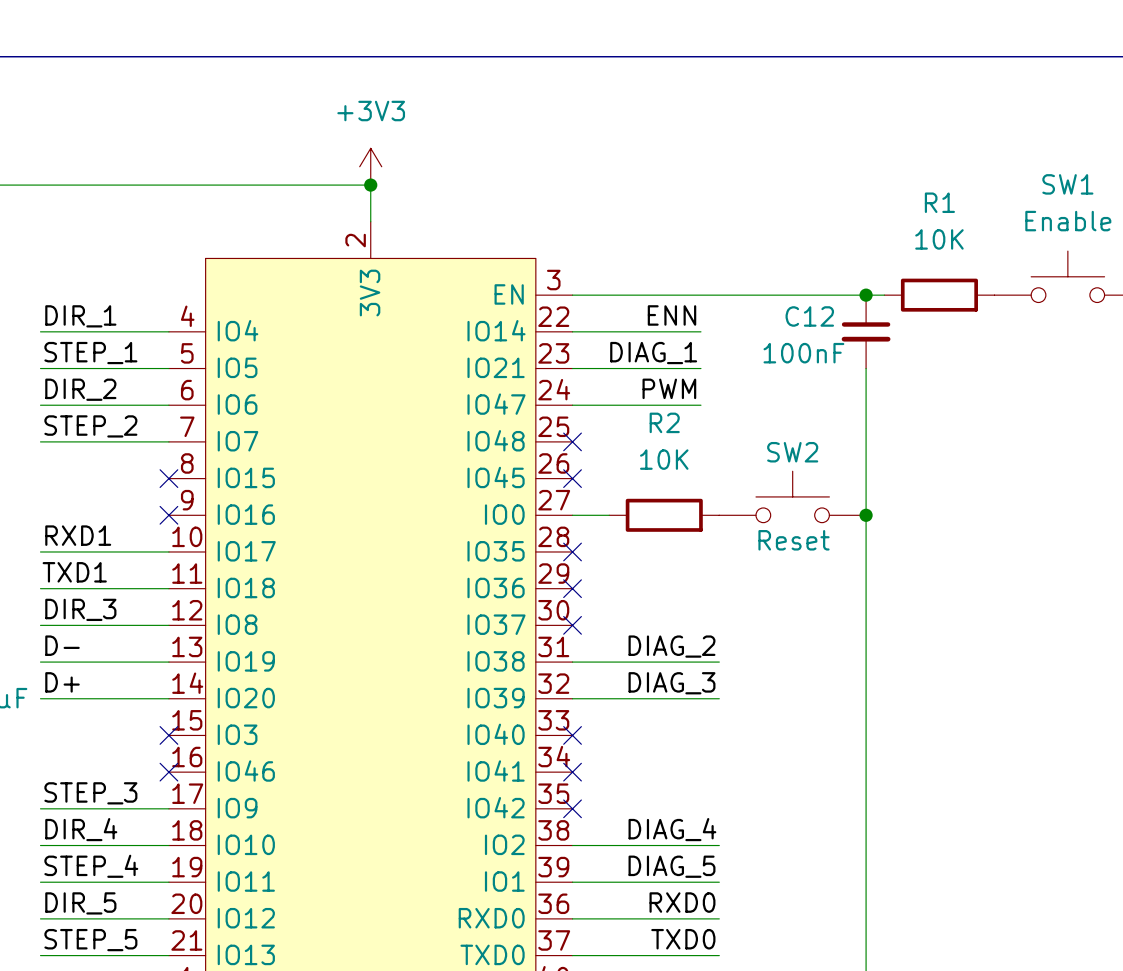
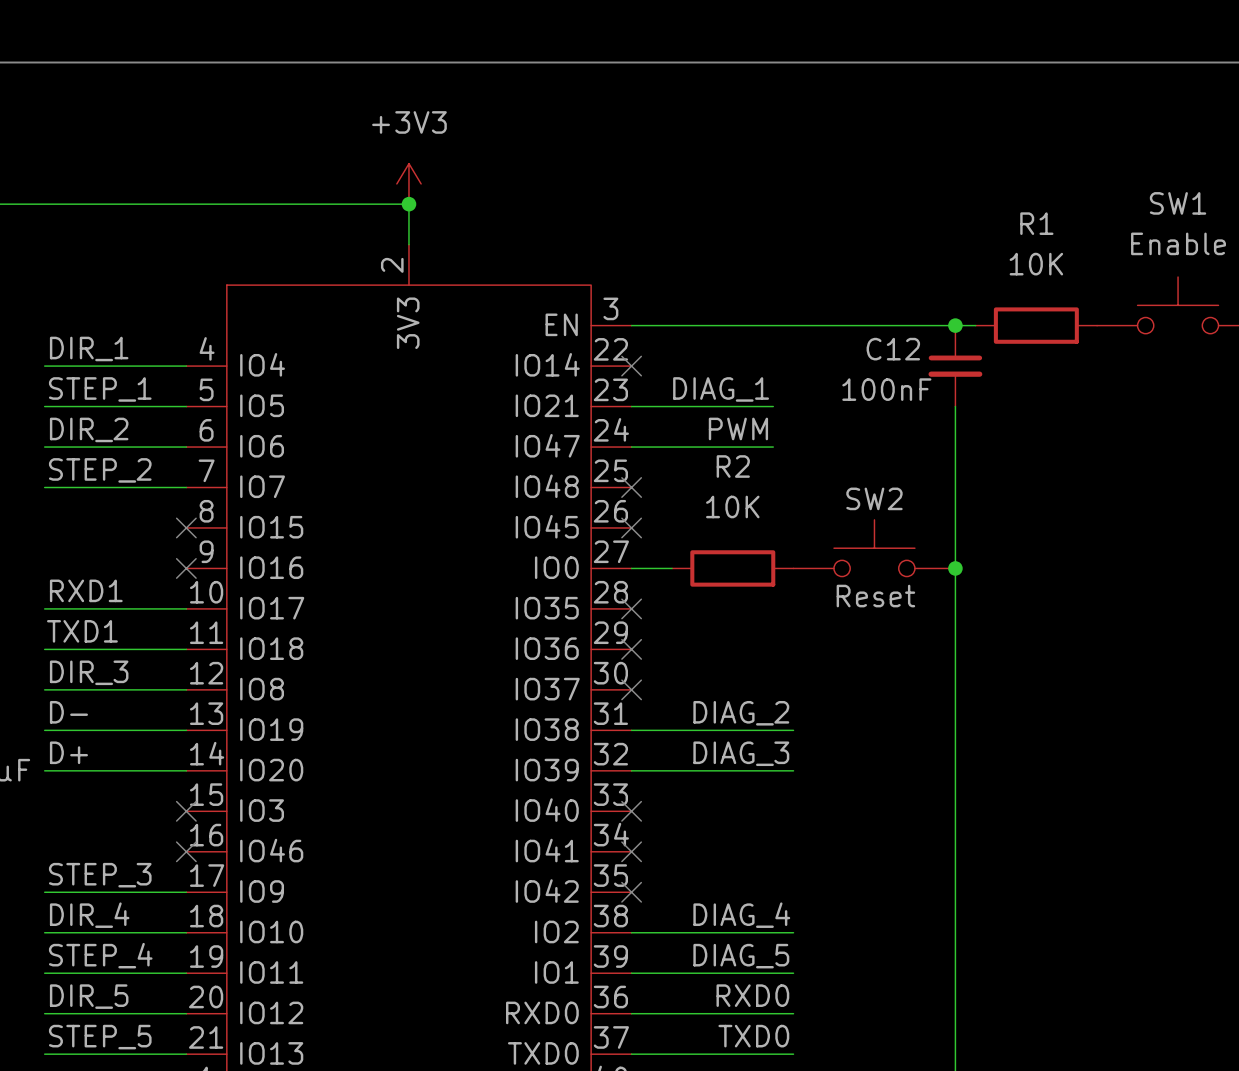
label: ENN (671, 315) -> none
wire: (572, 331) (700, 331) -> none
no-connect mark: none -> (631, 366)

